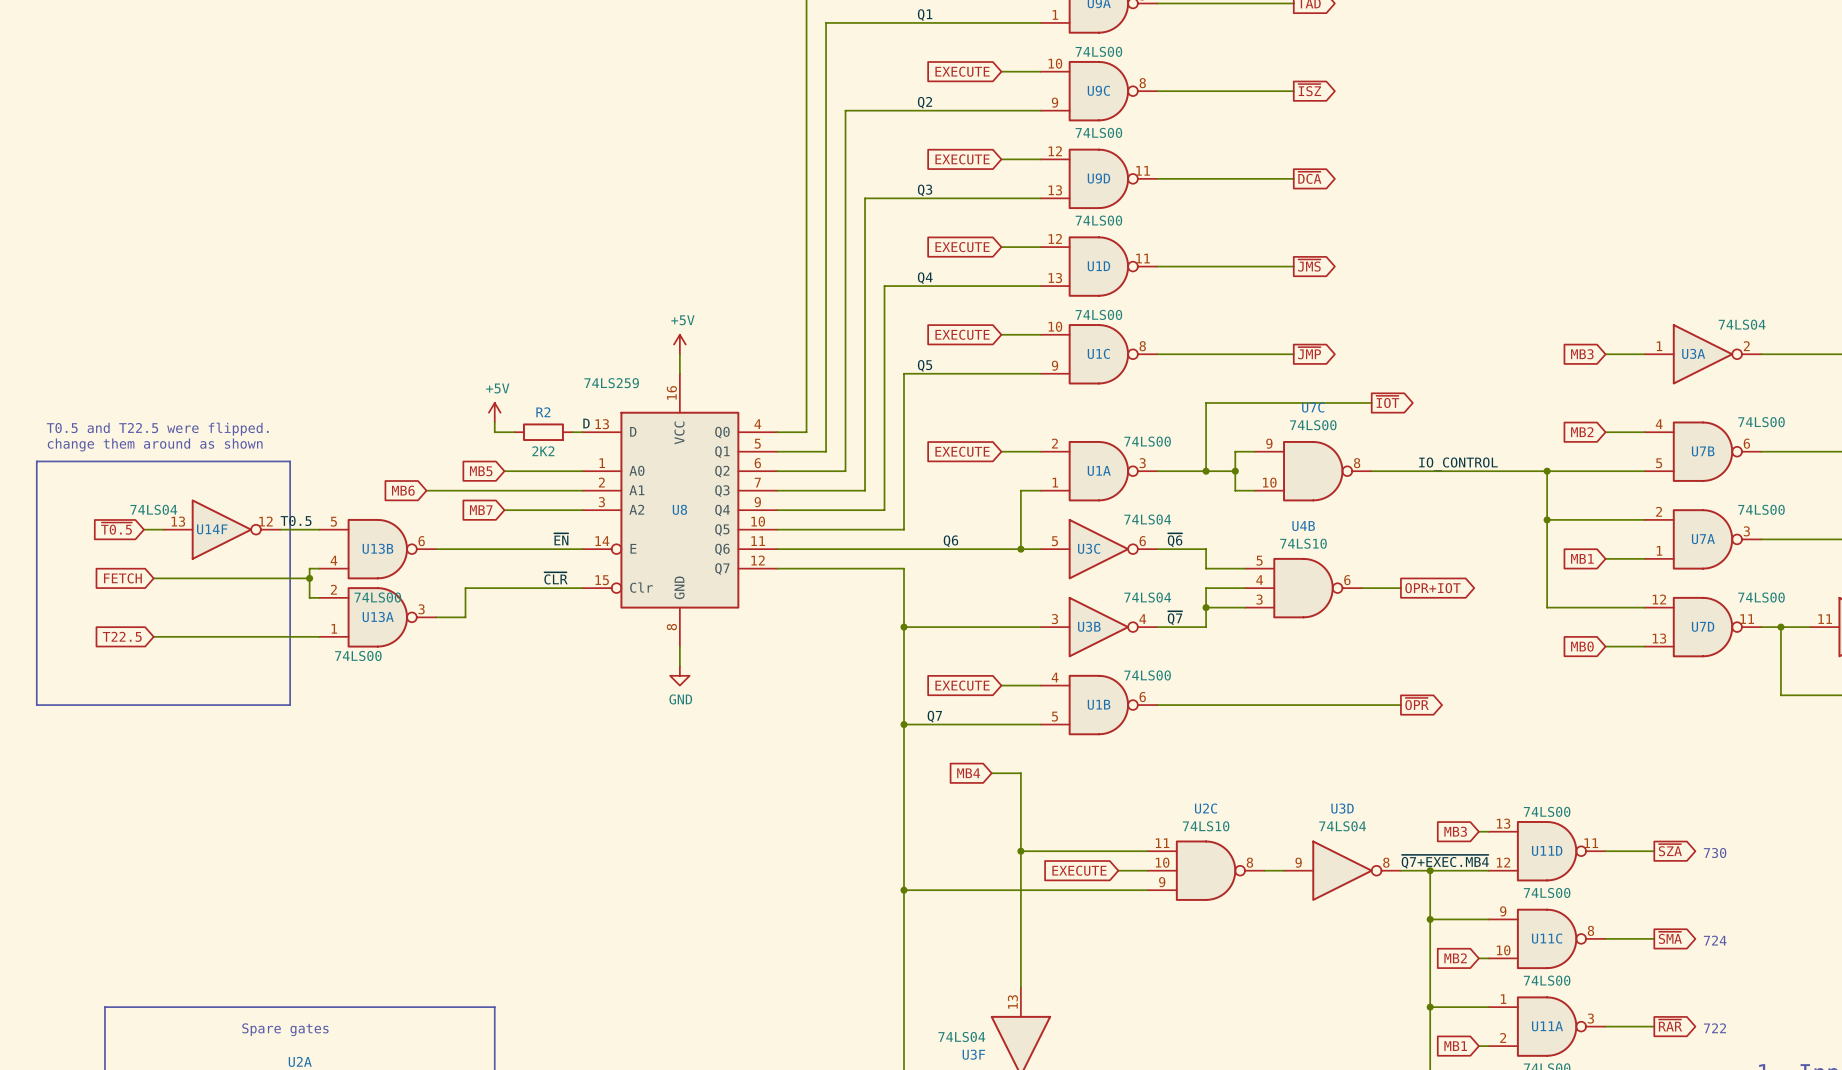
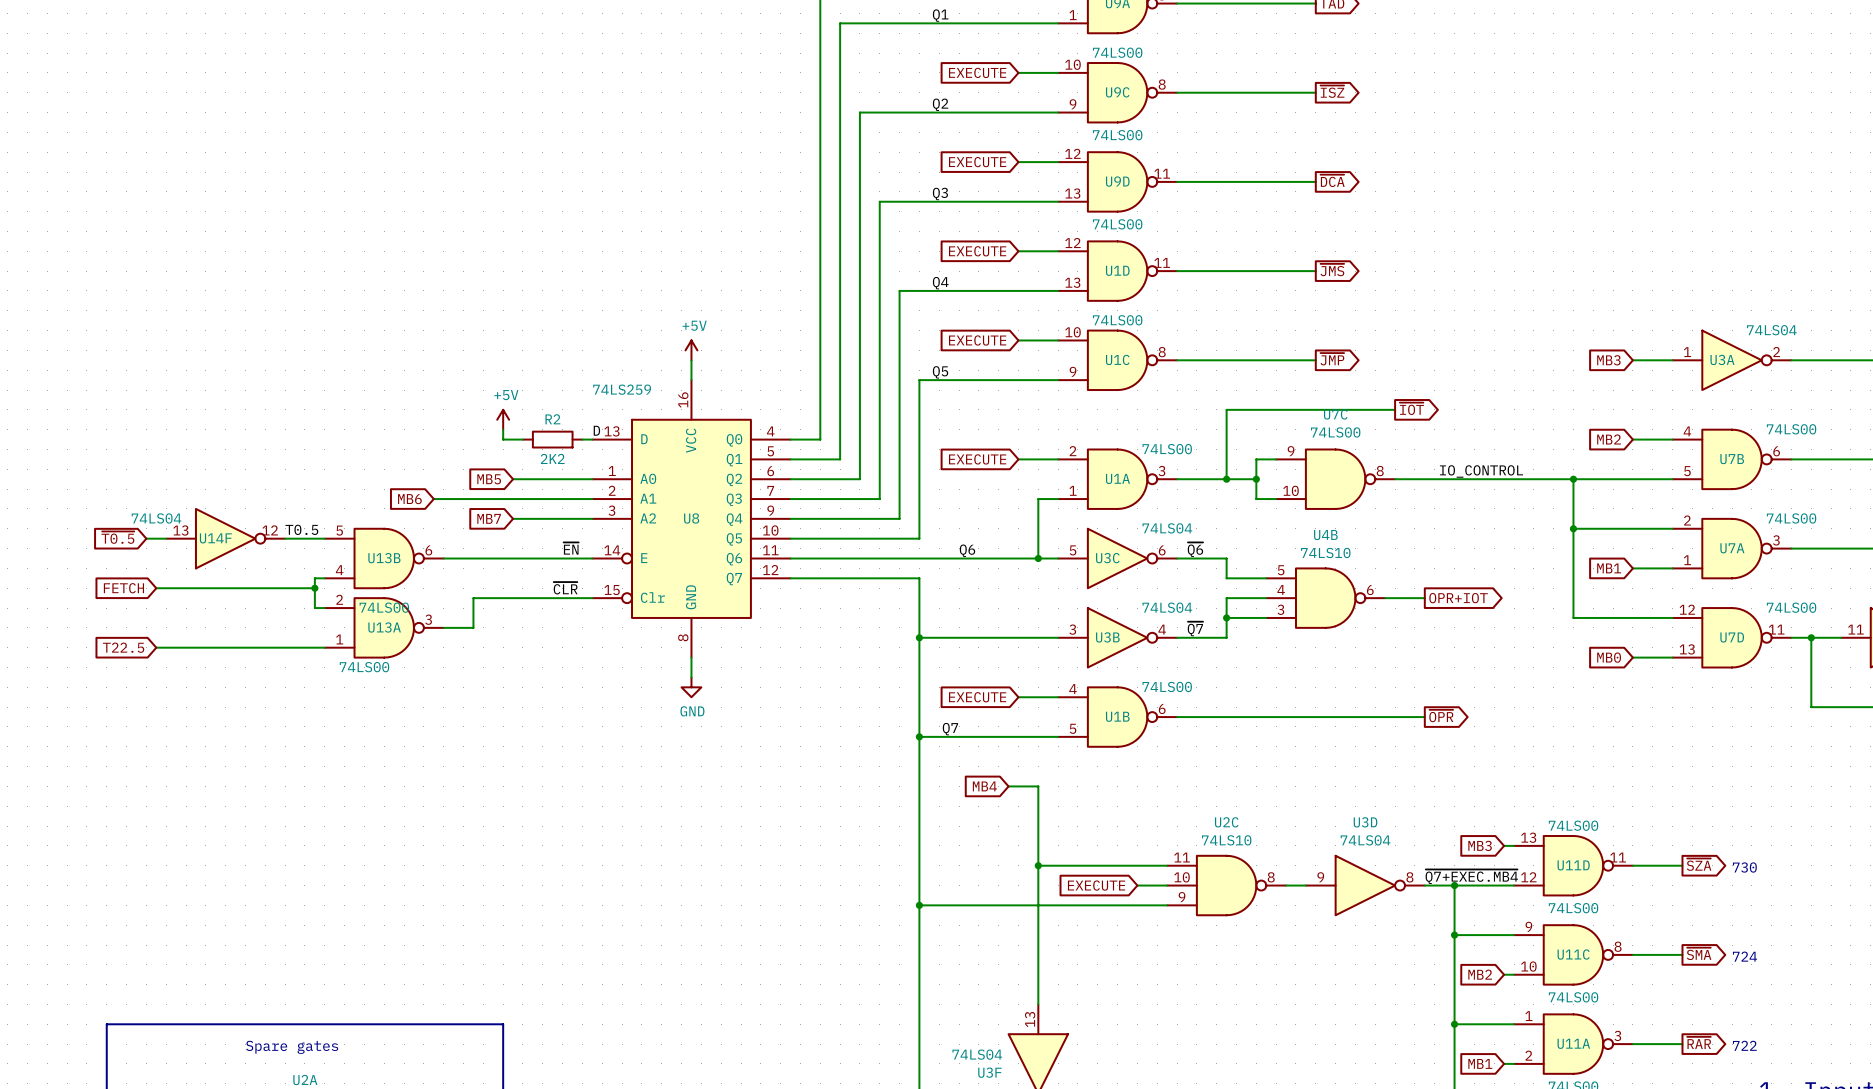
text: T0.5 and T22.5 were flipped. (157, 429) -> none
text: change them around as shown (155, 444) -> none
line: (36, 461) (36, 705) (290, 705) (290, 461) (36, 461) -> none

